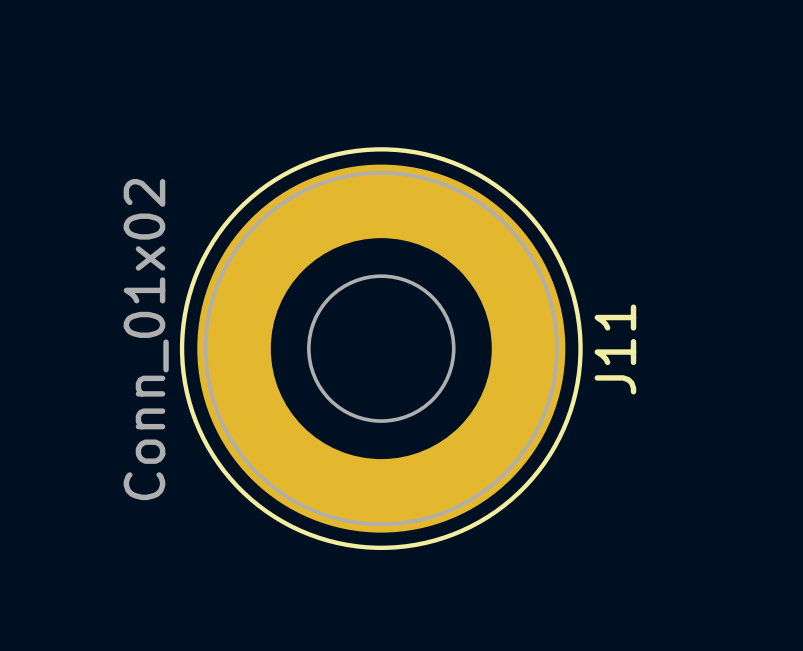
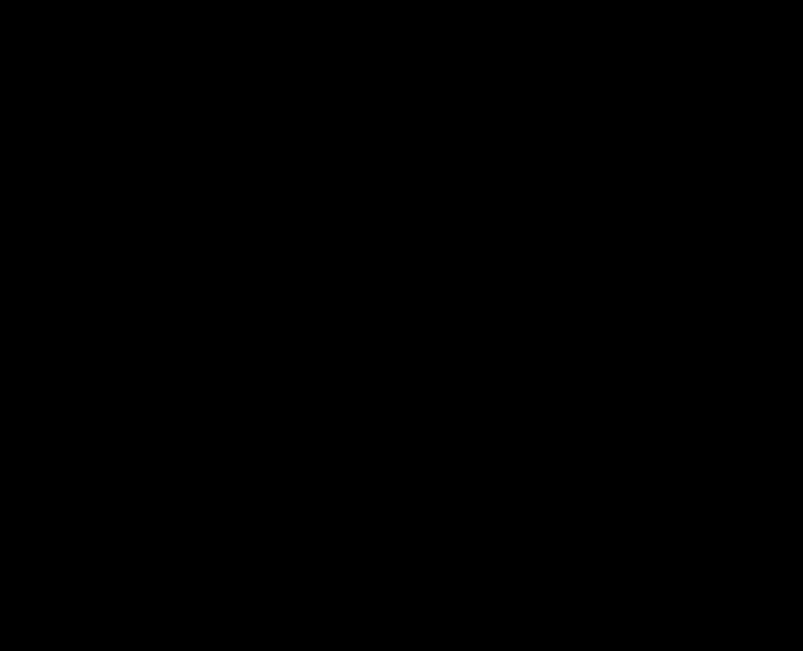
J11: Conn_01x02 (381, 348) -> none

